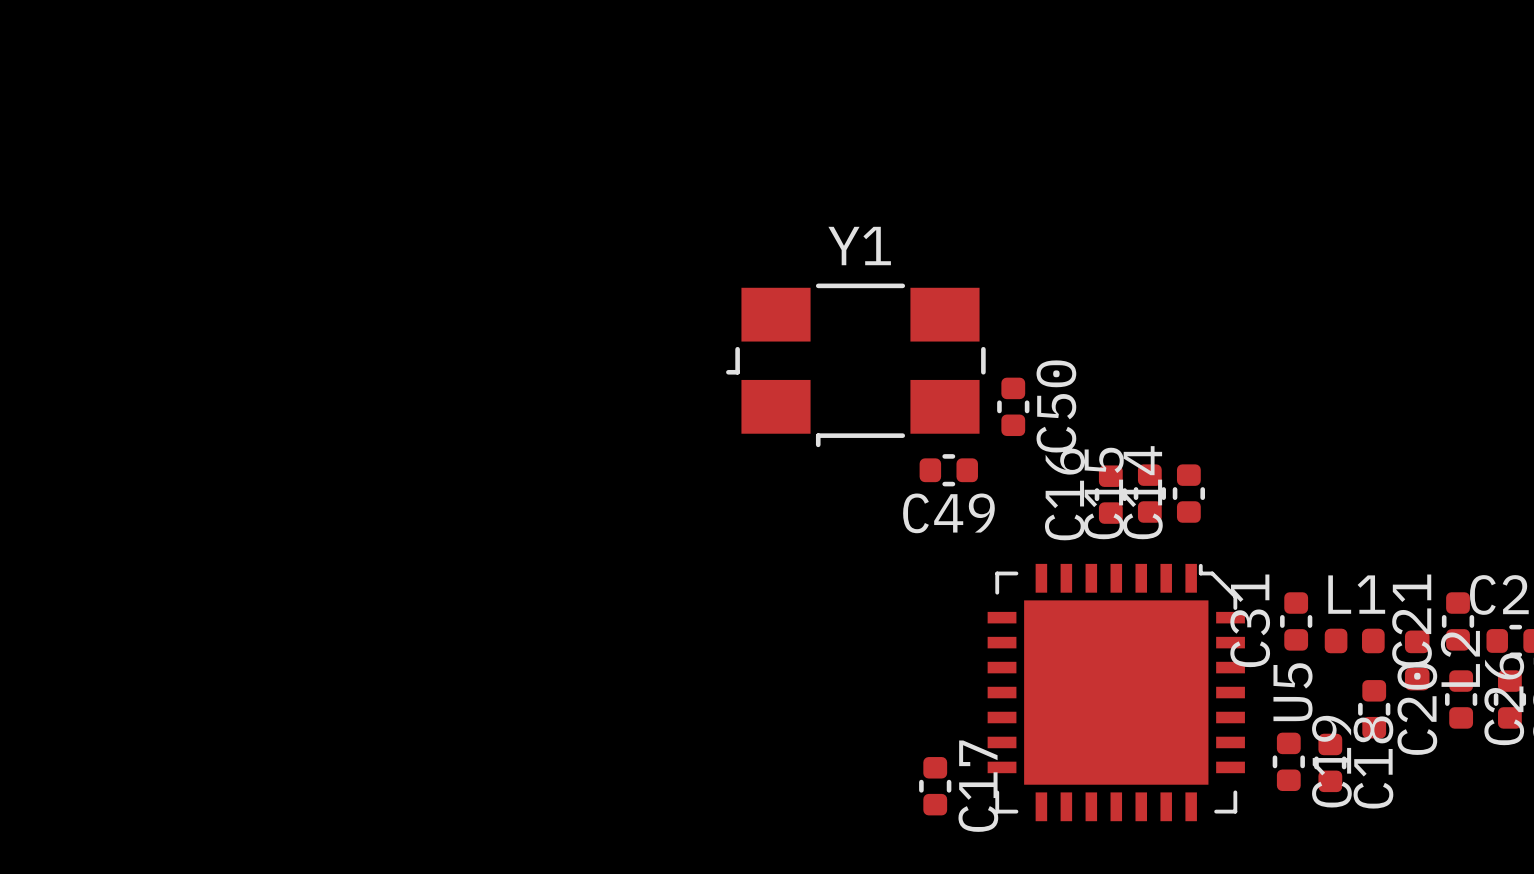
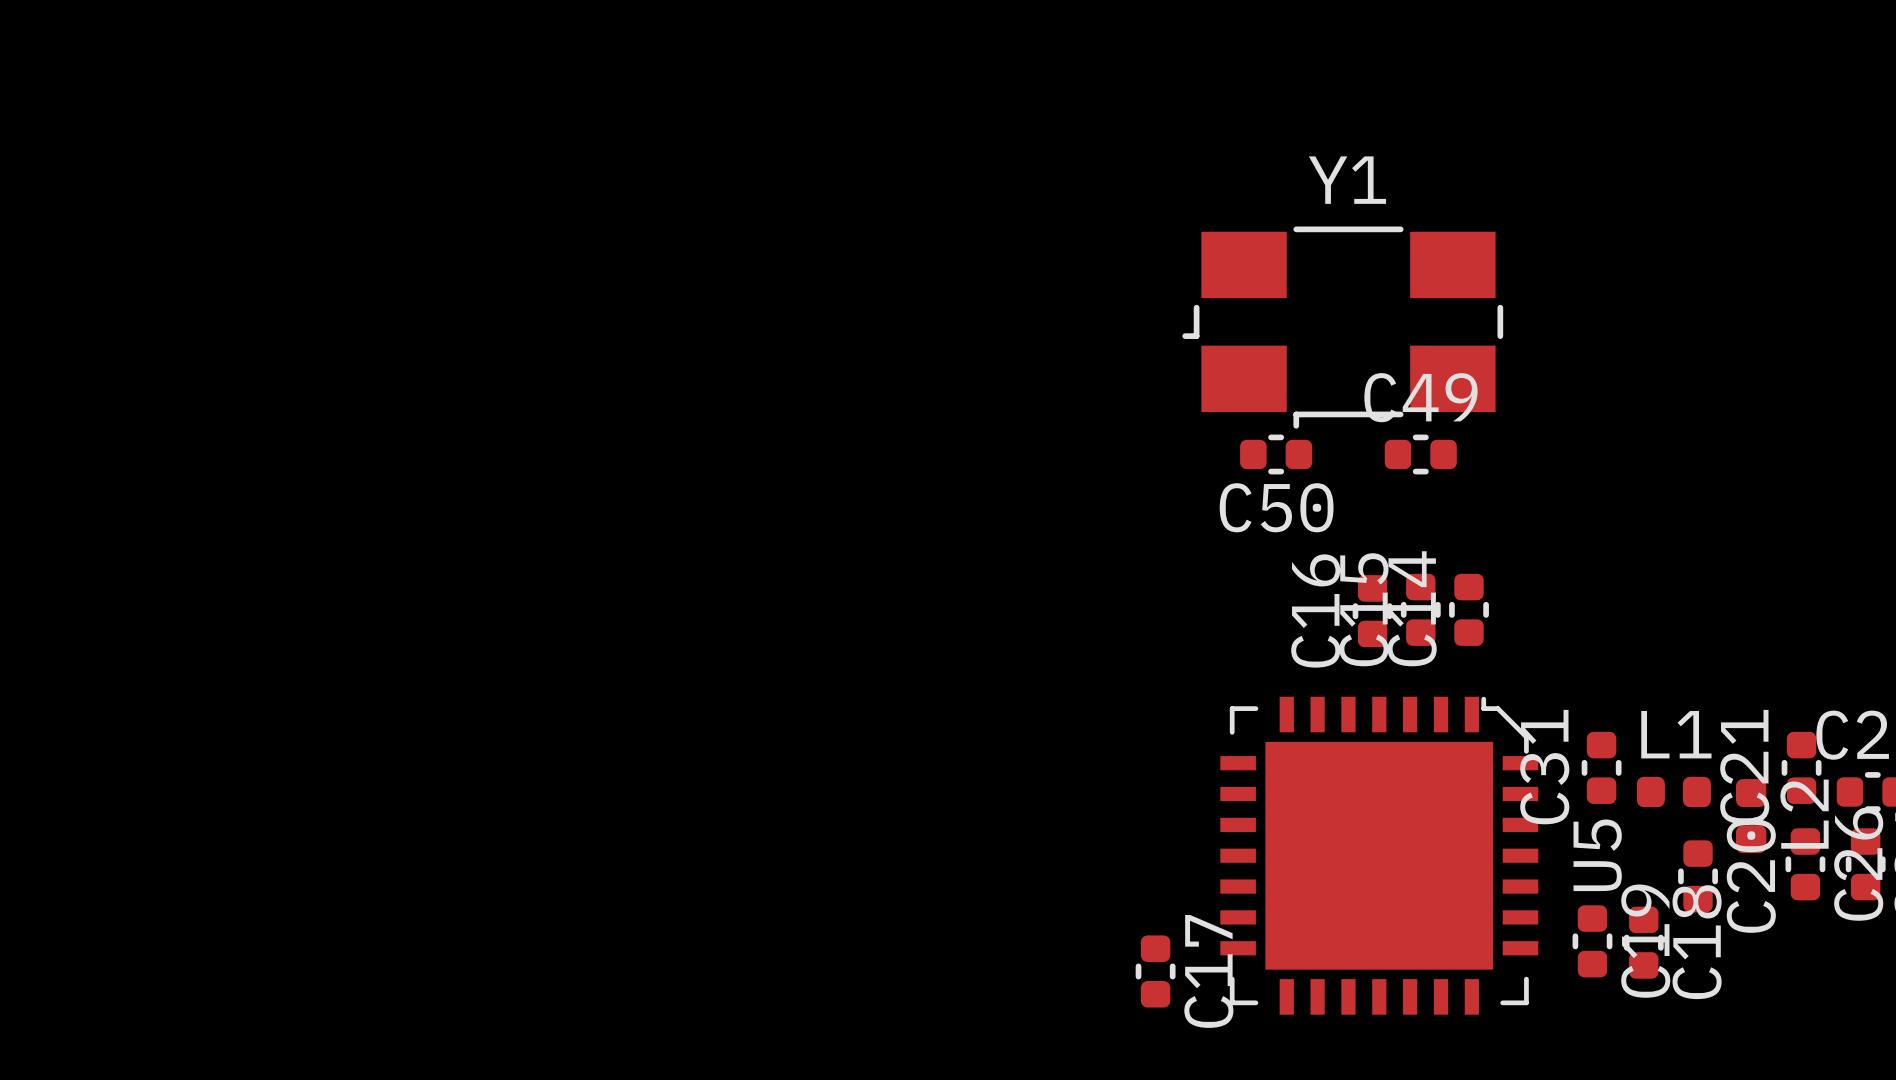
Y1 position: (855, 365) -> (1342, 327)
C50 rotation: 0° (1013, 406) -> 90° clockwise (1276, 454)
C50 position: (1013, 406) -> (1276, 454)
C49 position: (948, 470) -> (1420, 454)
C49 name position: C49 (948, 513) -> C49 (1420, 397)

